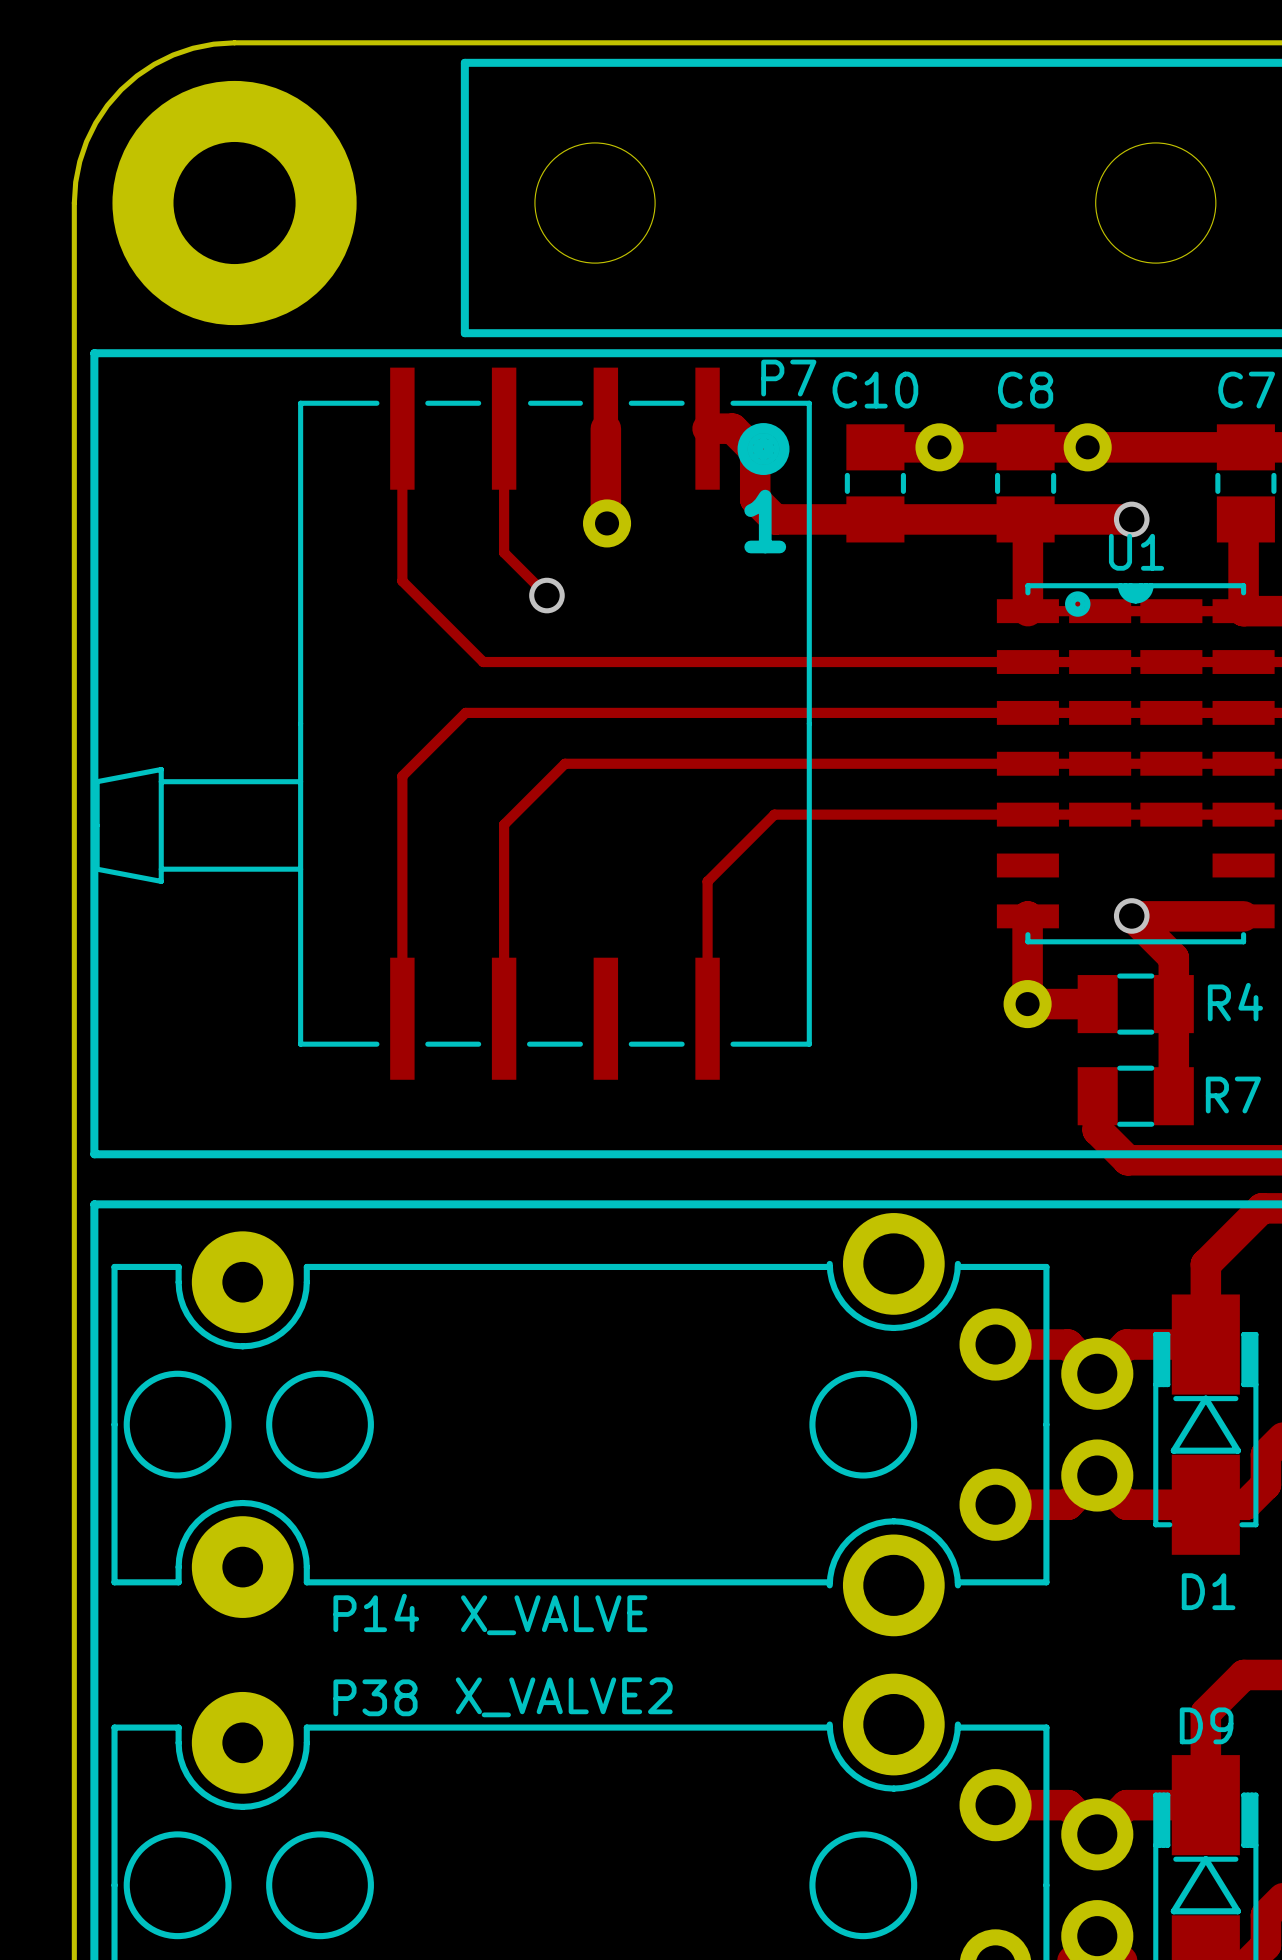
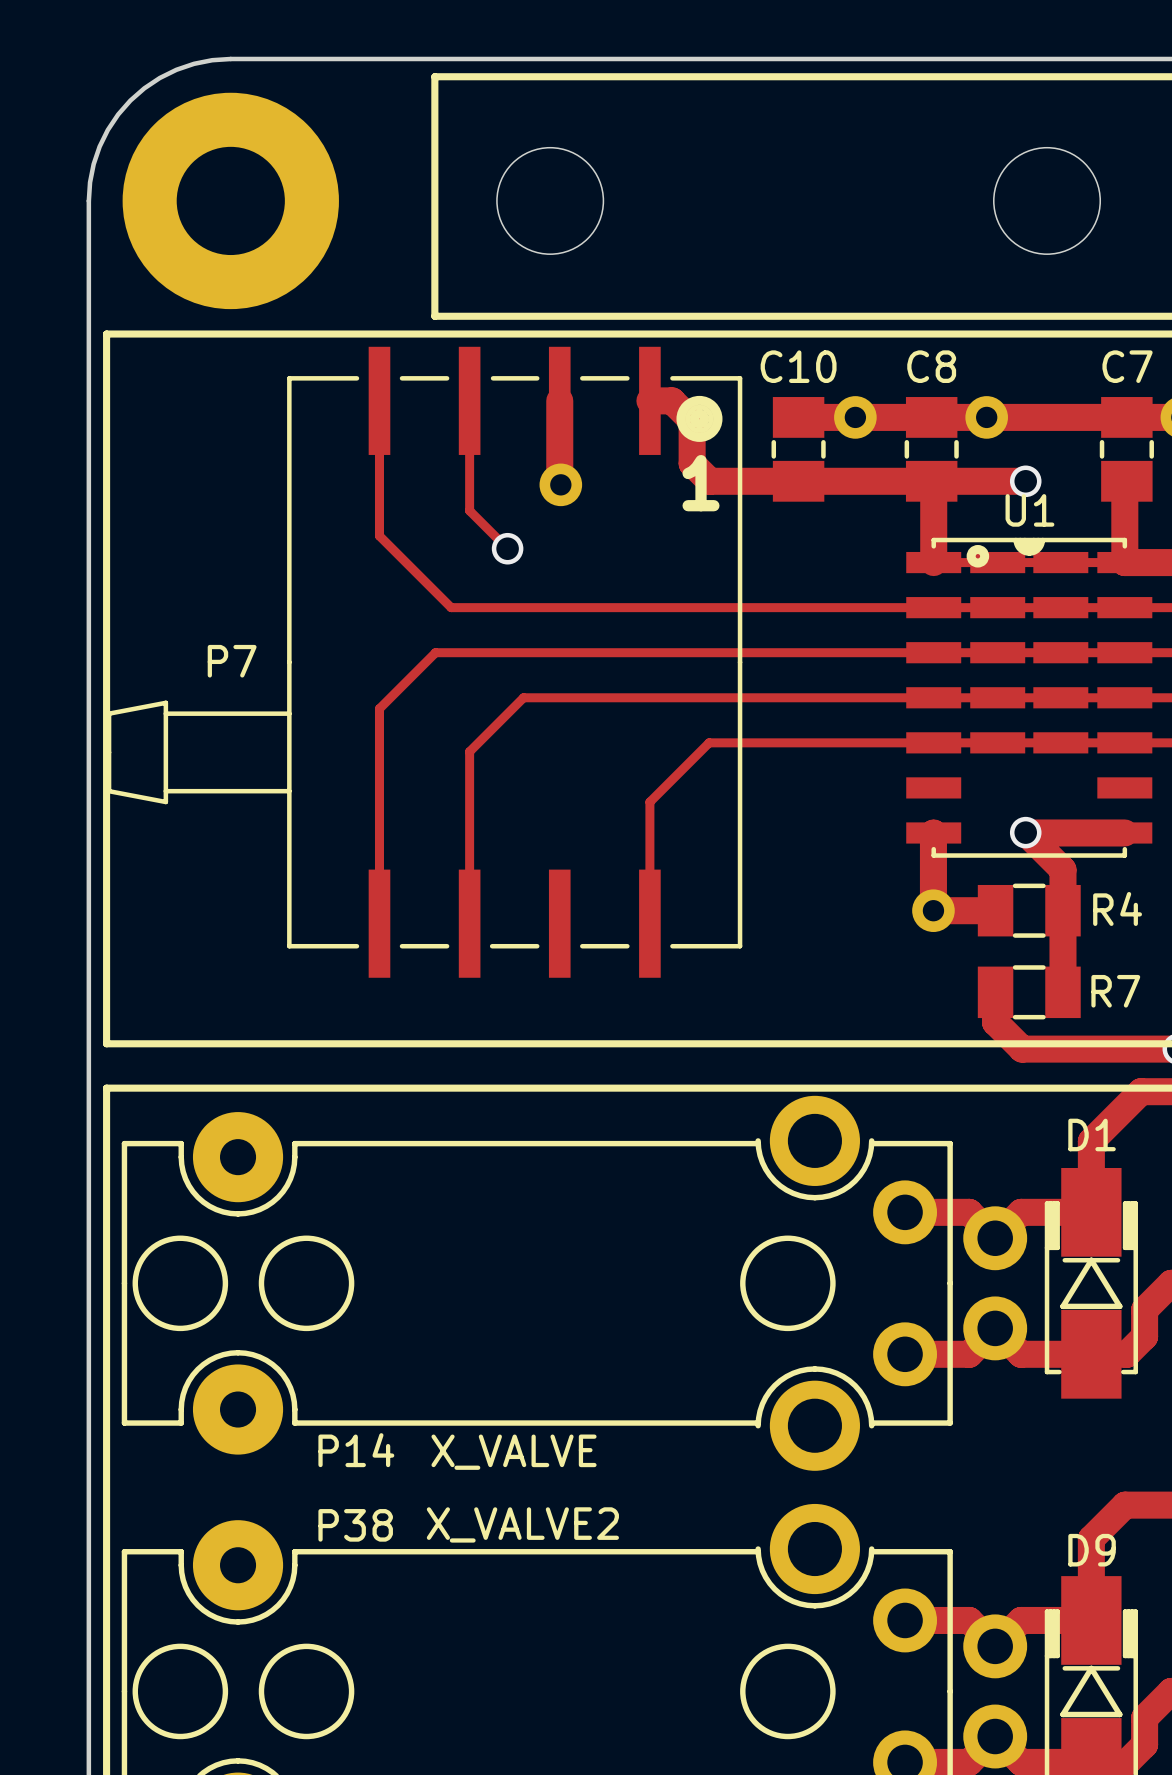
P7 name position: P7 (788, 378) -> P7 (232, 661)
D1 name position: D1 (1208, 1591) -> D1 (1092, 1134)

